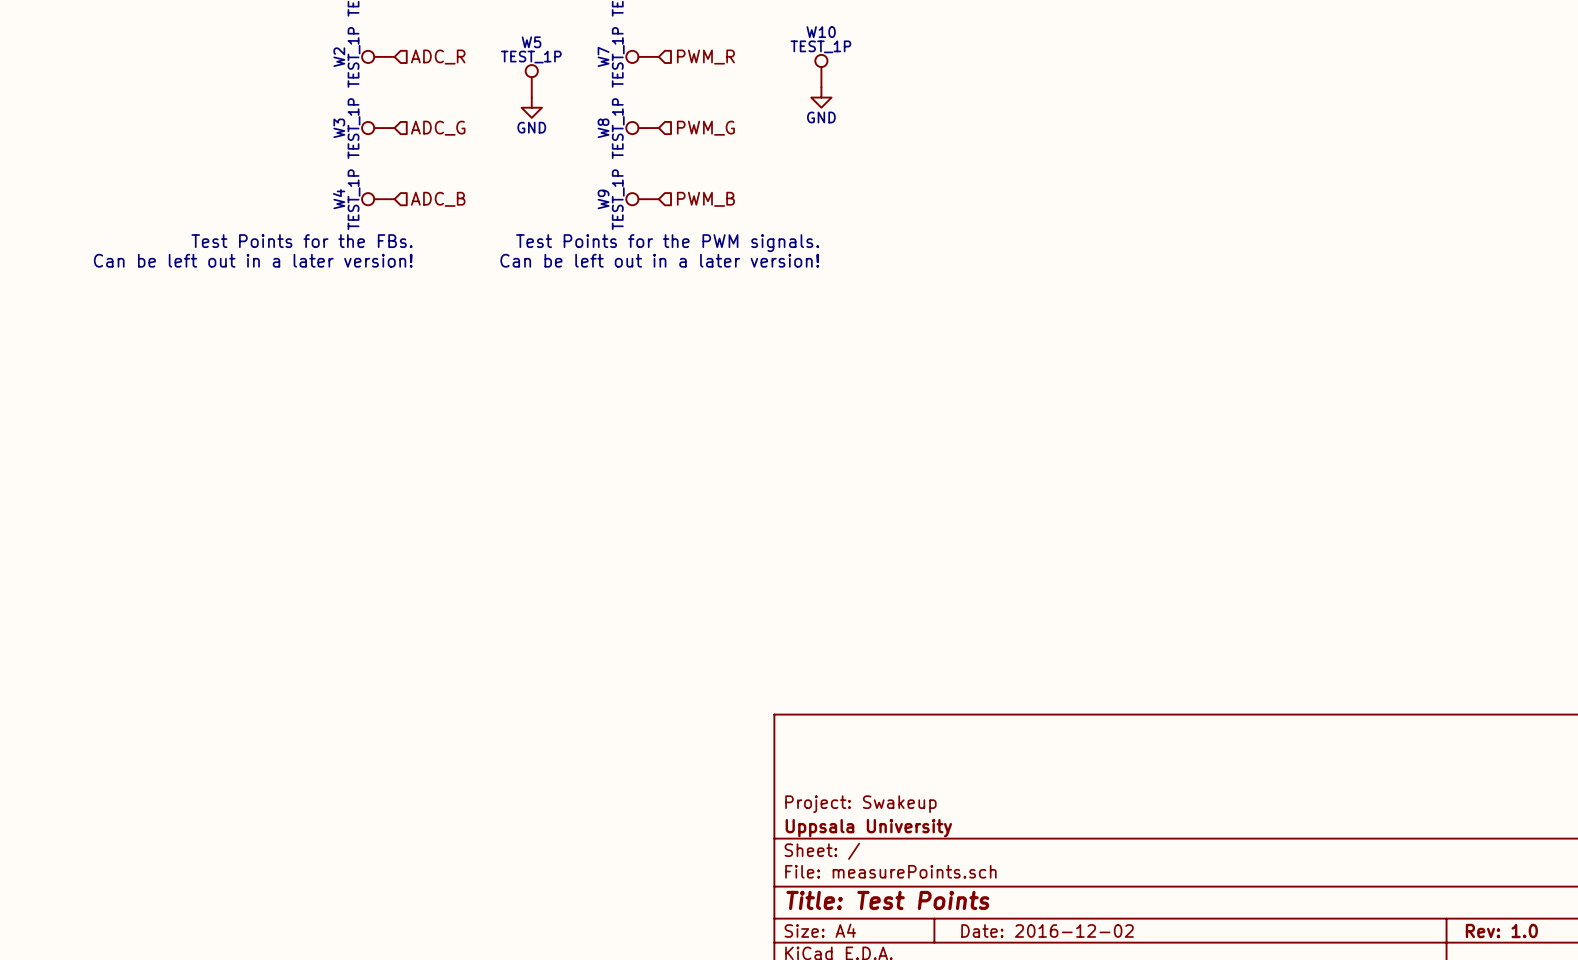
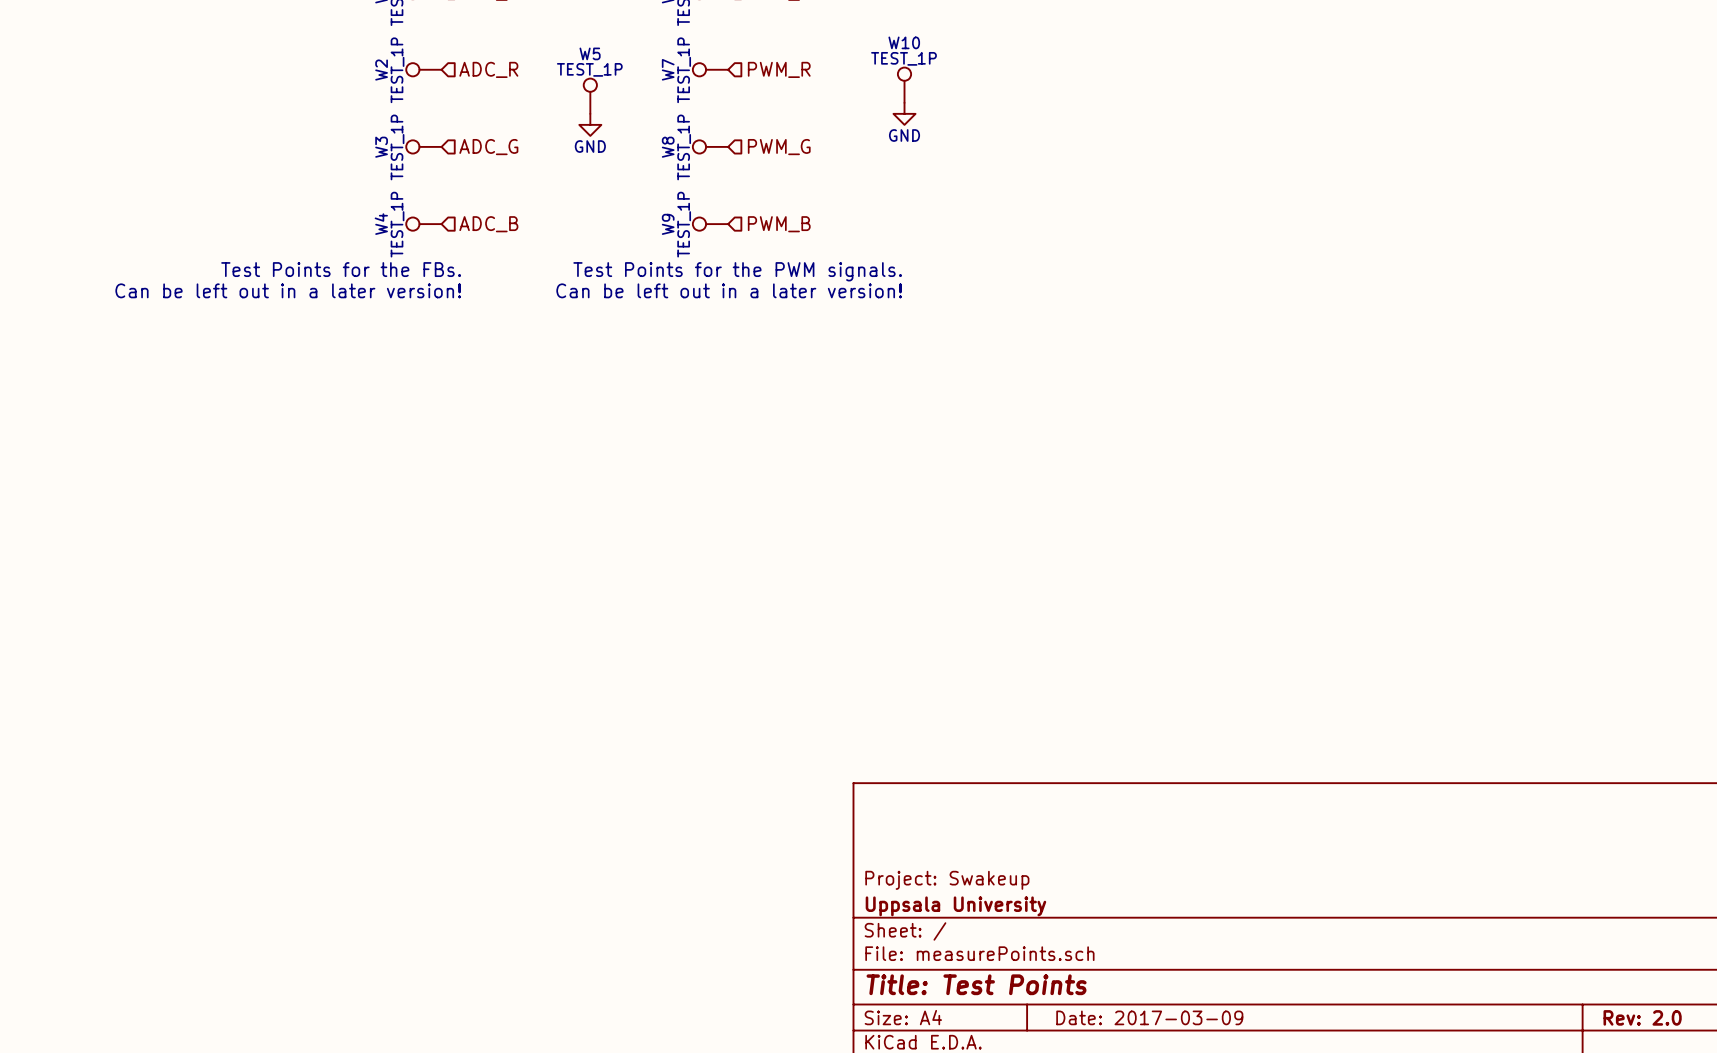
title block: Date: 2016-12-02 (1047, 930) -> Date: 2017-03-09 (1149, 1017)
title block: Rev: 1.0 (1501, 930) -> Rev: 2.0 (1642, 1017)

